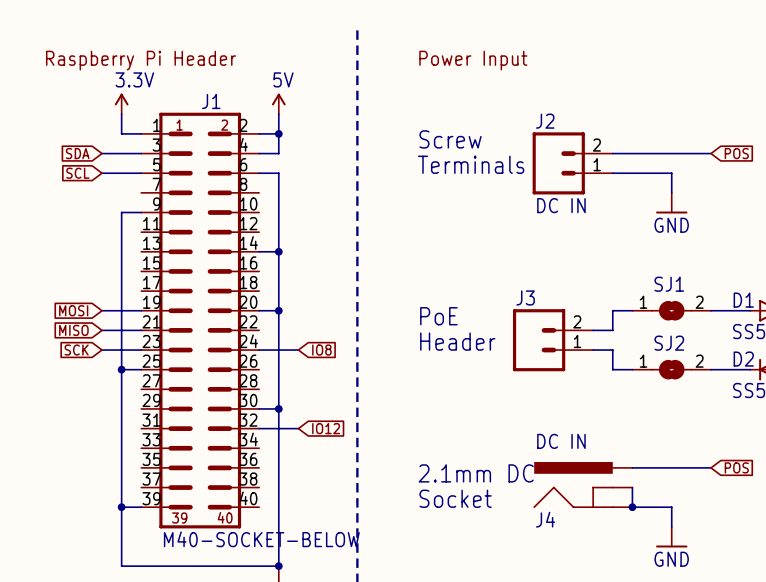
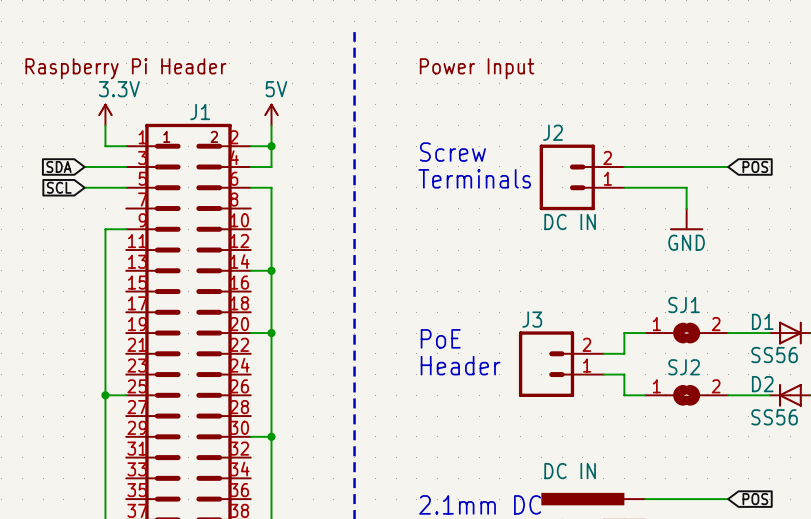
global label: MOSI (73, 310) -> none
wire: (101, 310) (141, 310) -> none
global label: MISO (73, 330) -> none
wire: (101, 330) (141, 330) -> none
global label: SCK (76, 350) -> none
wire: (101, 350) (141, 350) -> none
wire: (259, 350) (298, 350) -> none
global label: IO8 (321, 350) -> none
wire: (259, 428) (298, 428) -> none
global label: IO12 (326, 428) -> none

